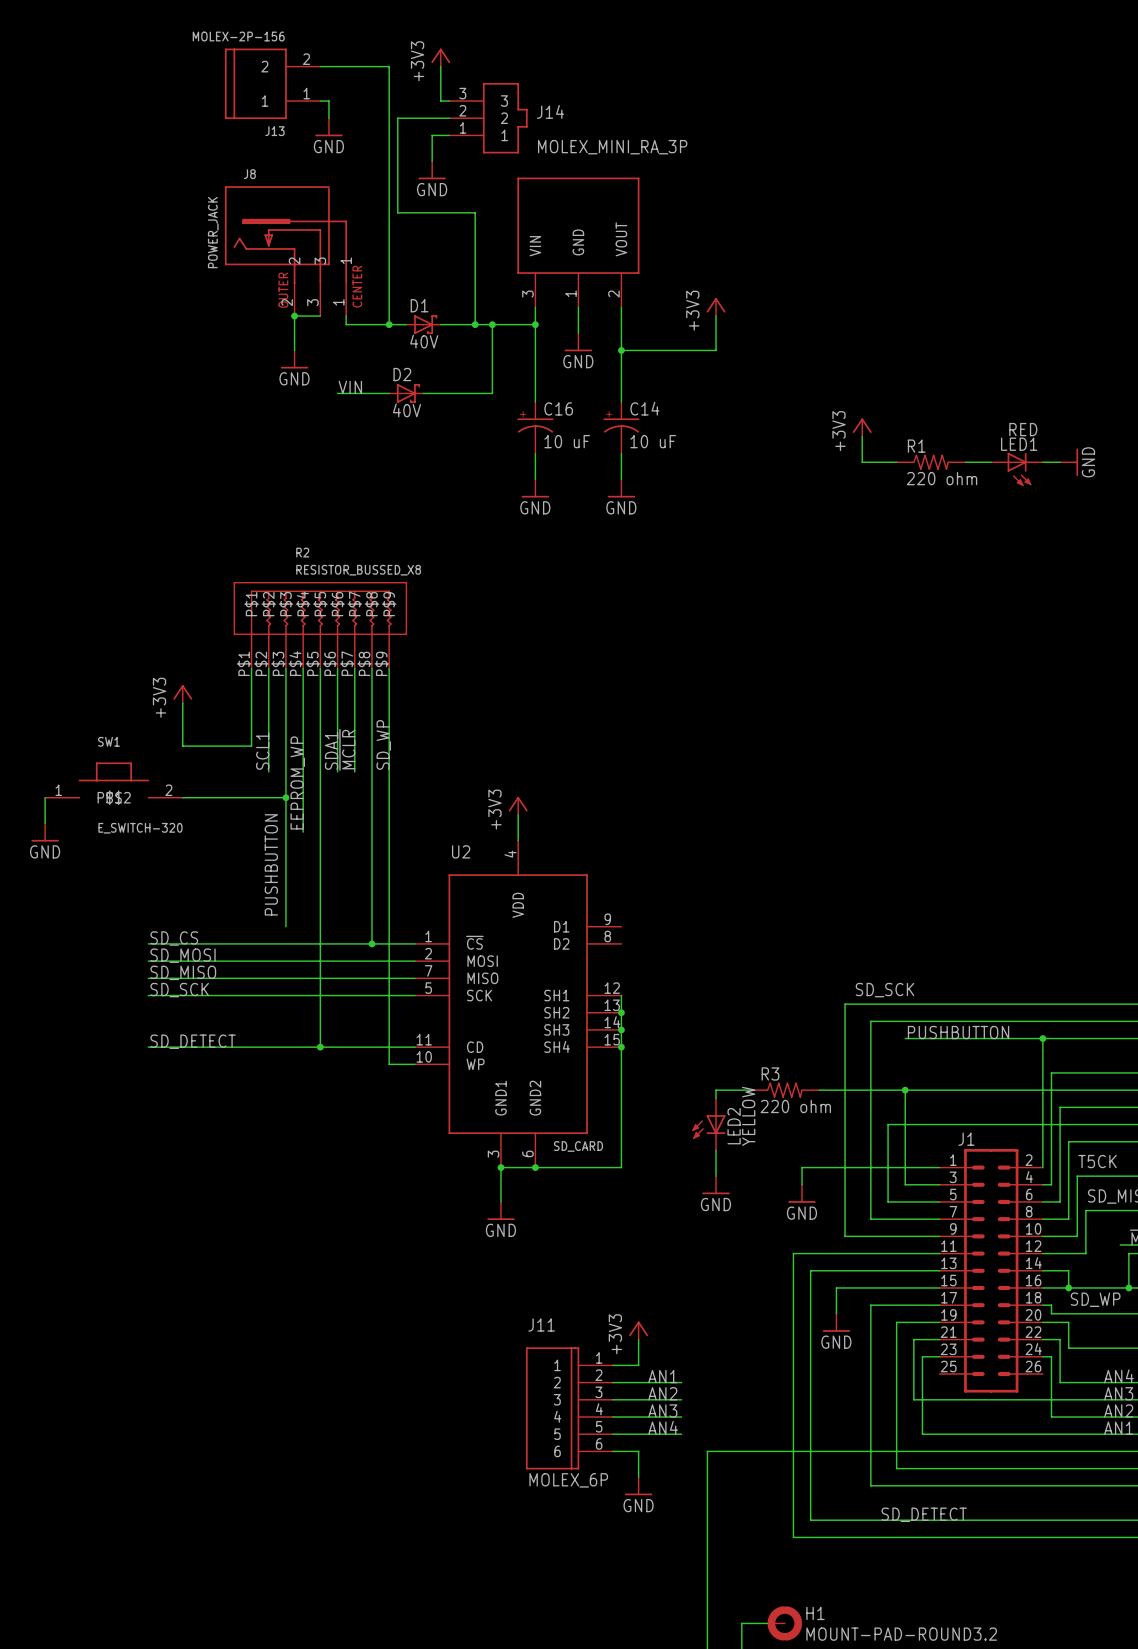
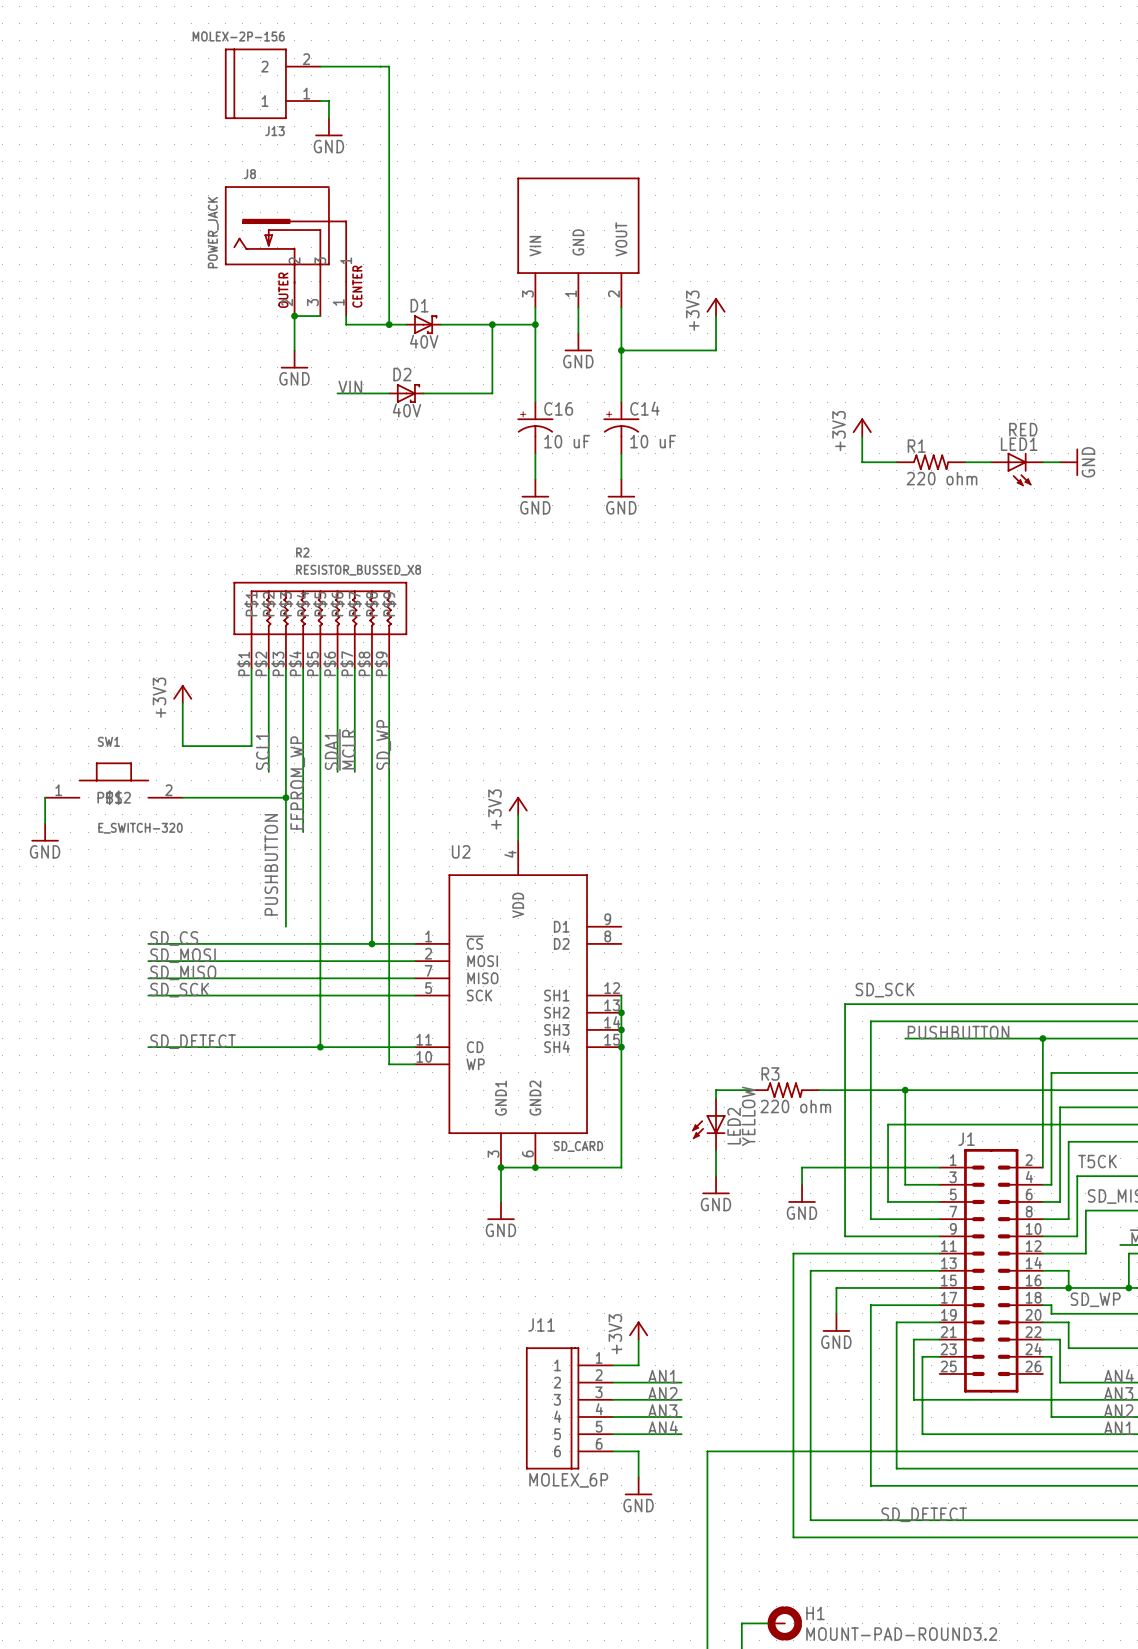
power symbol: +3V3 (440, 57) -> none
wire: (440, 66) (440, 101) (449, 101) -> none
wire: (449, 118) (397, 118) (397, 212) (475, 212) (475, 324) -> none
J14: MOLEX_MINI_RA_3P (488, 118) -> none
wire: (449, 135) (432, 135) (432, 161) -> none
power symbol: GND (432, 170) -> none
junction: (475, 324) -> none

